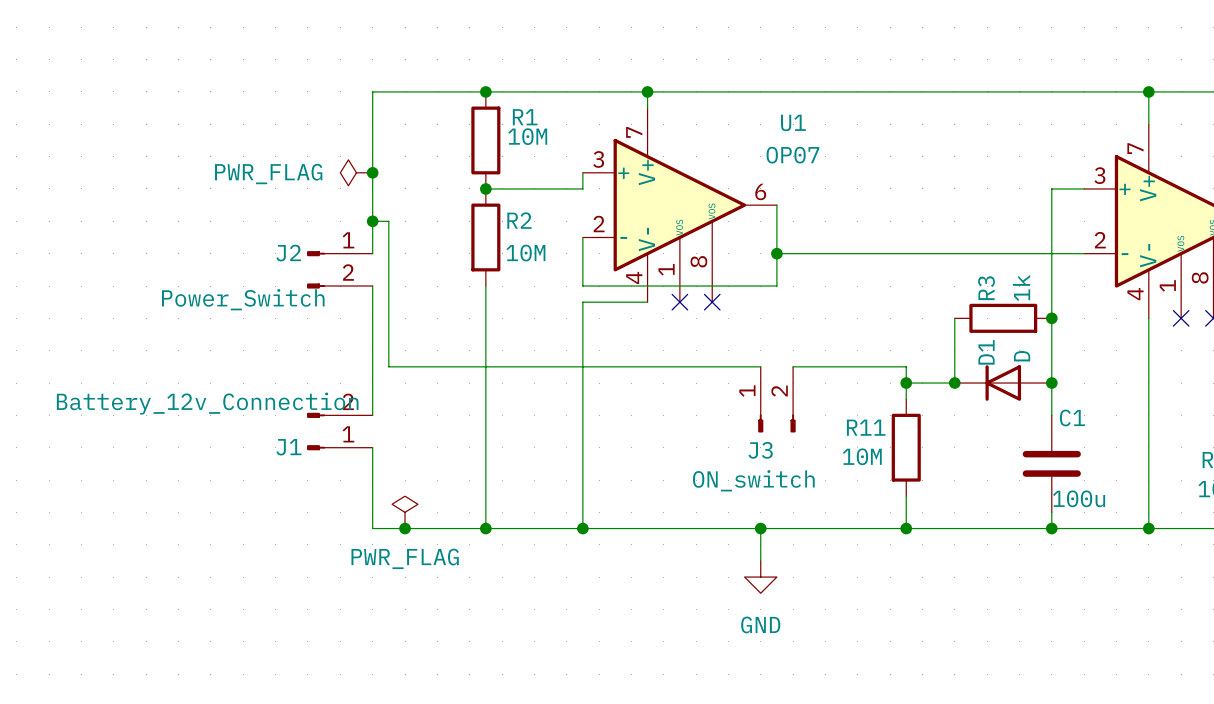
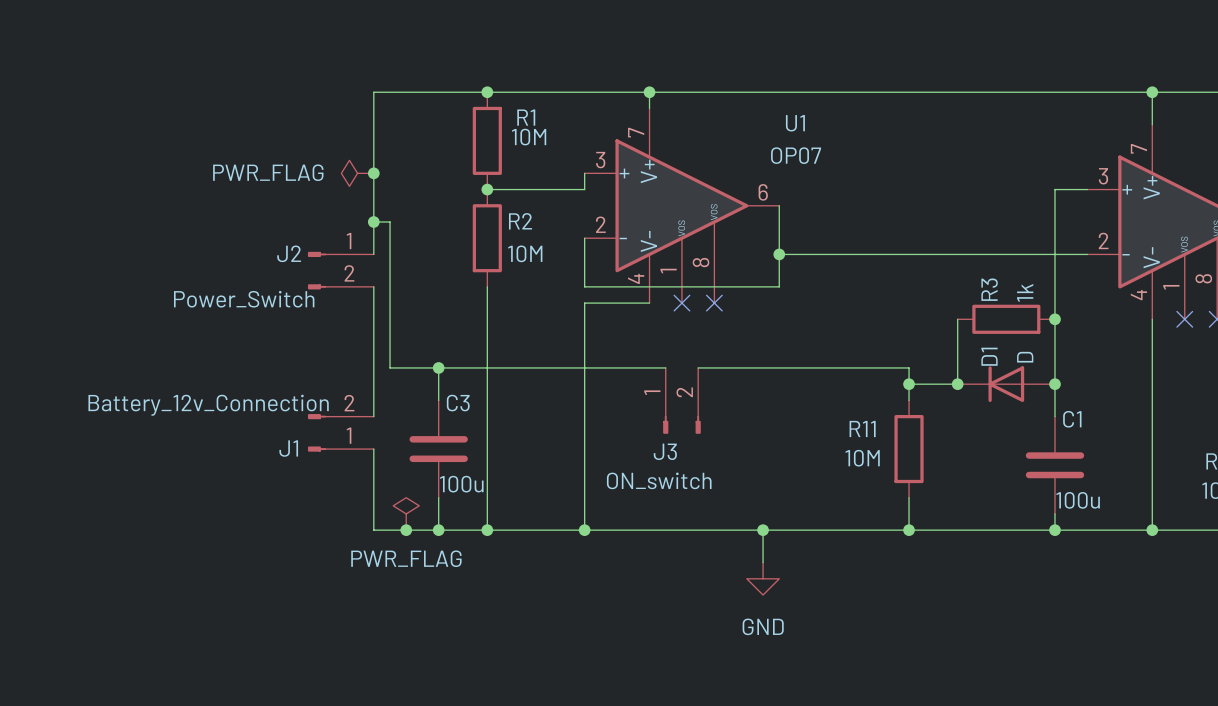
wire: none -> (438, 367) (438, 400)
junction: none -> (438, 367)
wire: (663, 366) (696, 366) -> (763, 367) (795, 367)
J3 position: (776, 399) -> (681, 400)
C3: none -> 100u (438, 449)
wire: none -> (438, 497) (438, 530)
junction: none -> (438, 530)

